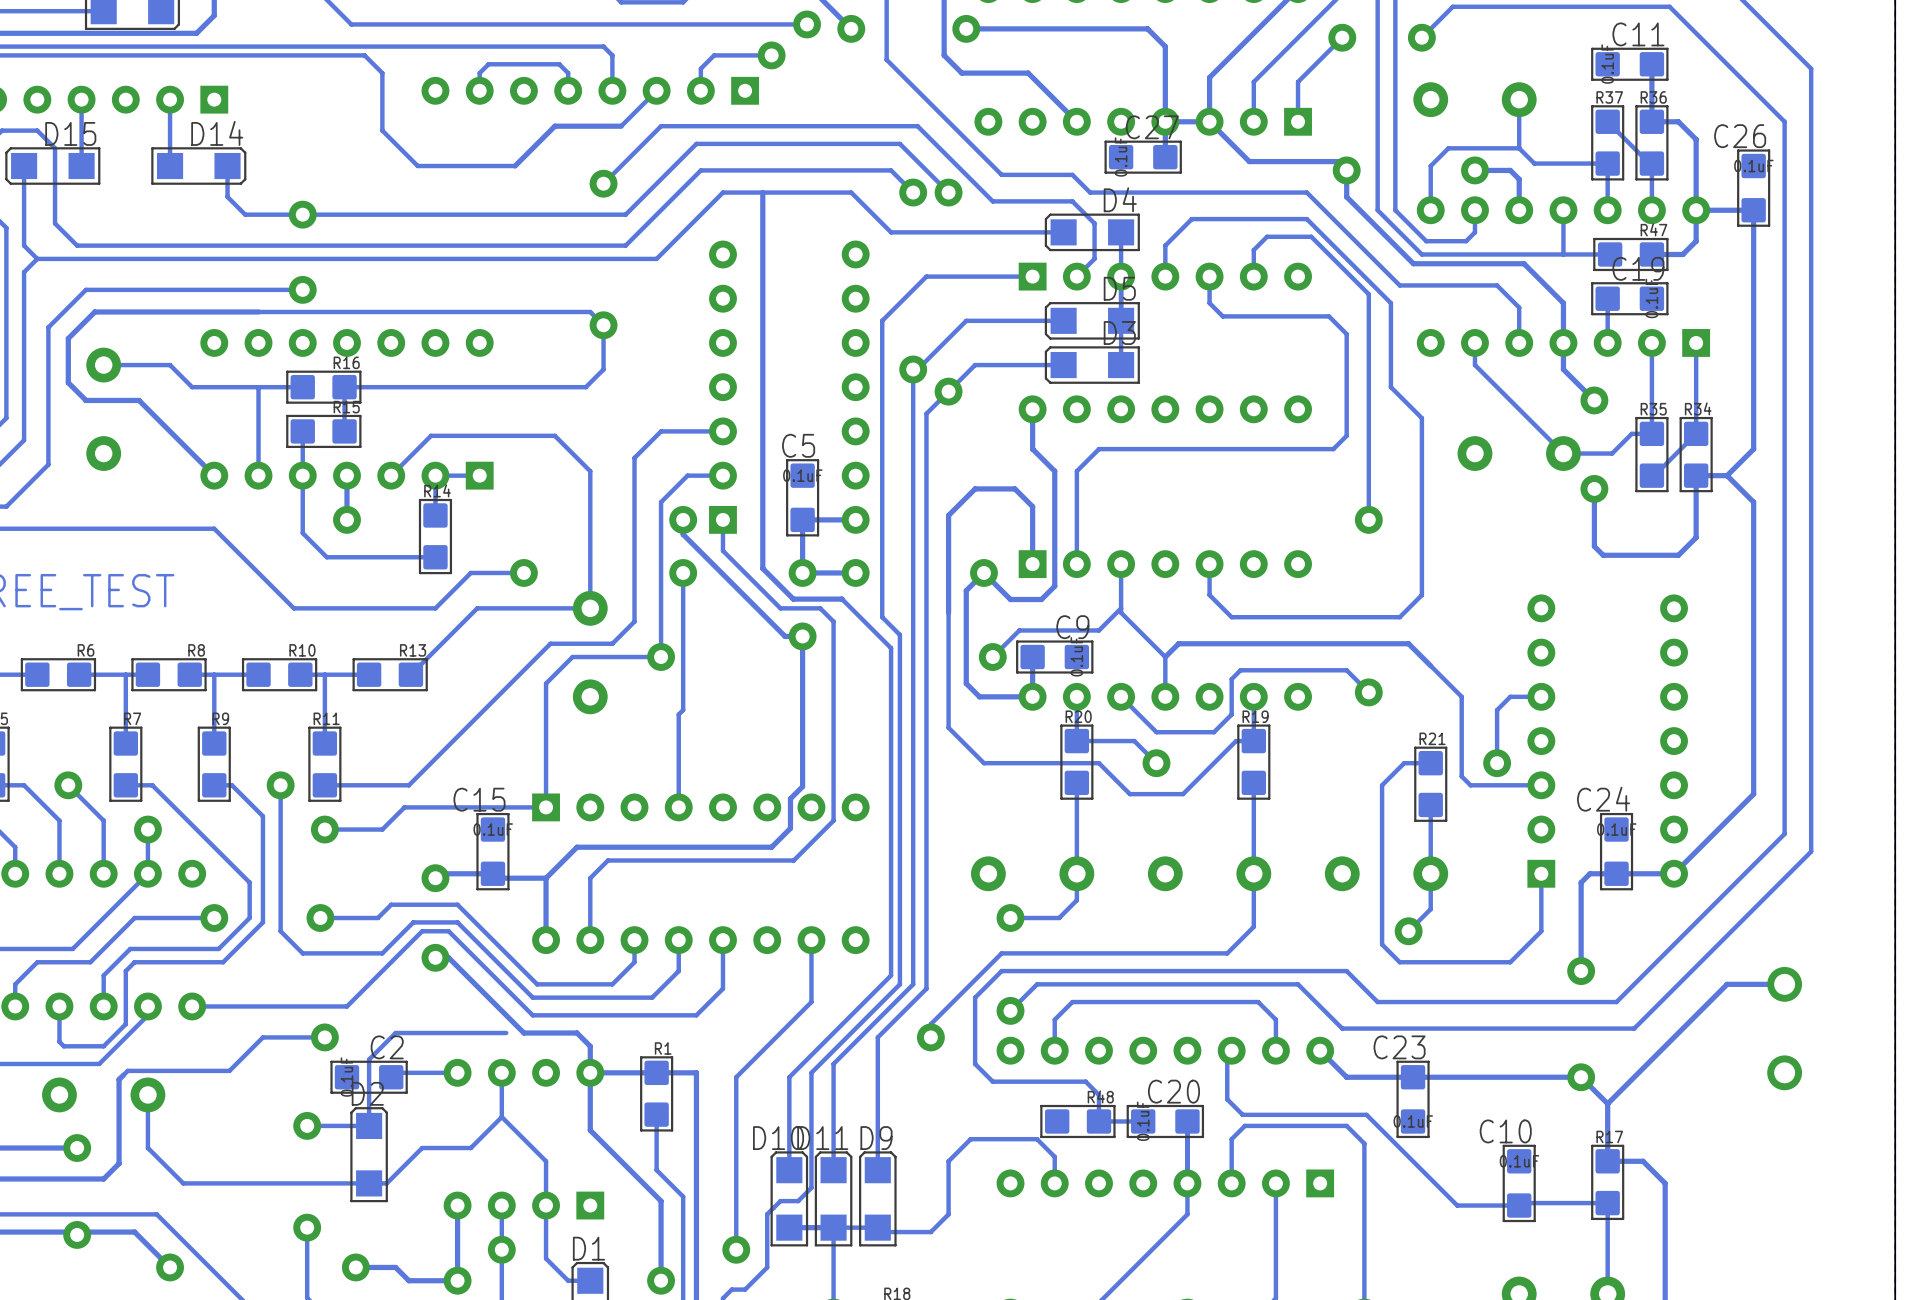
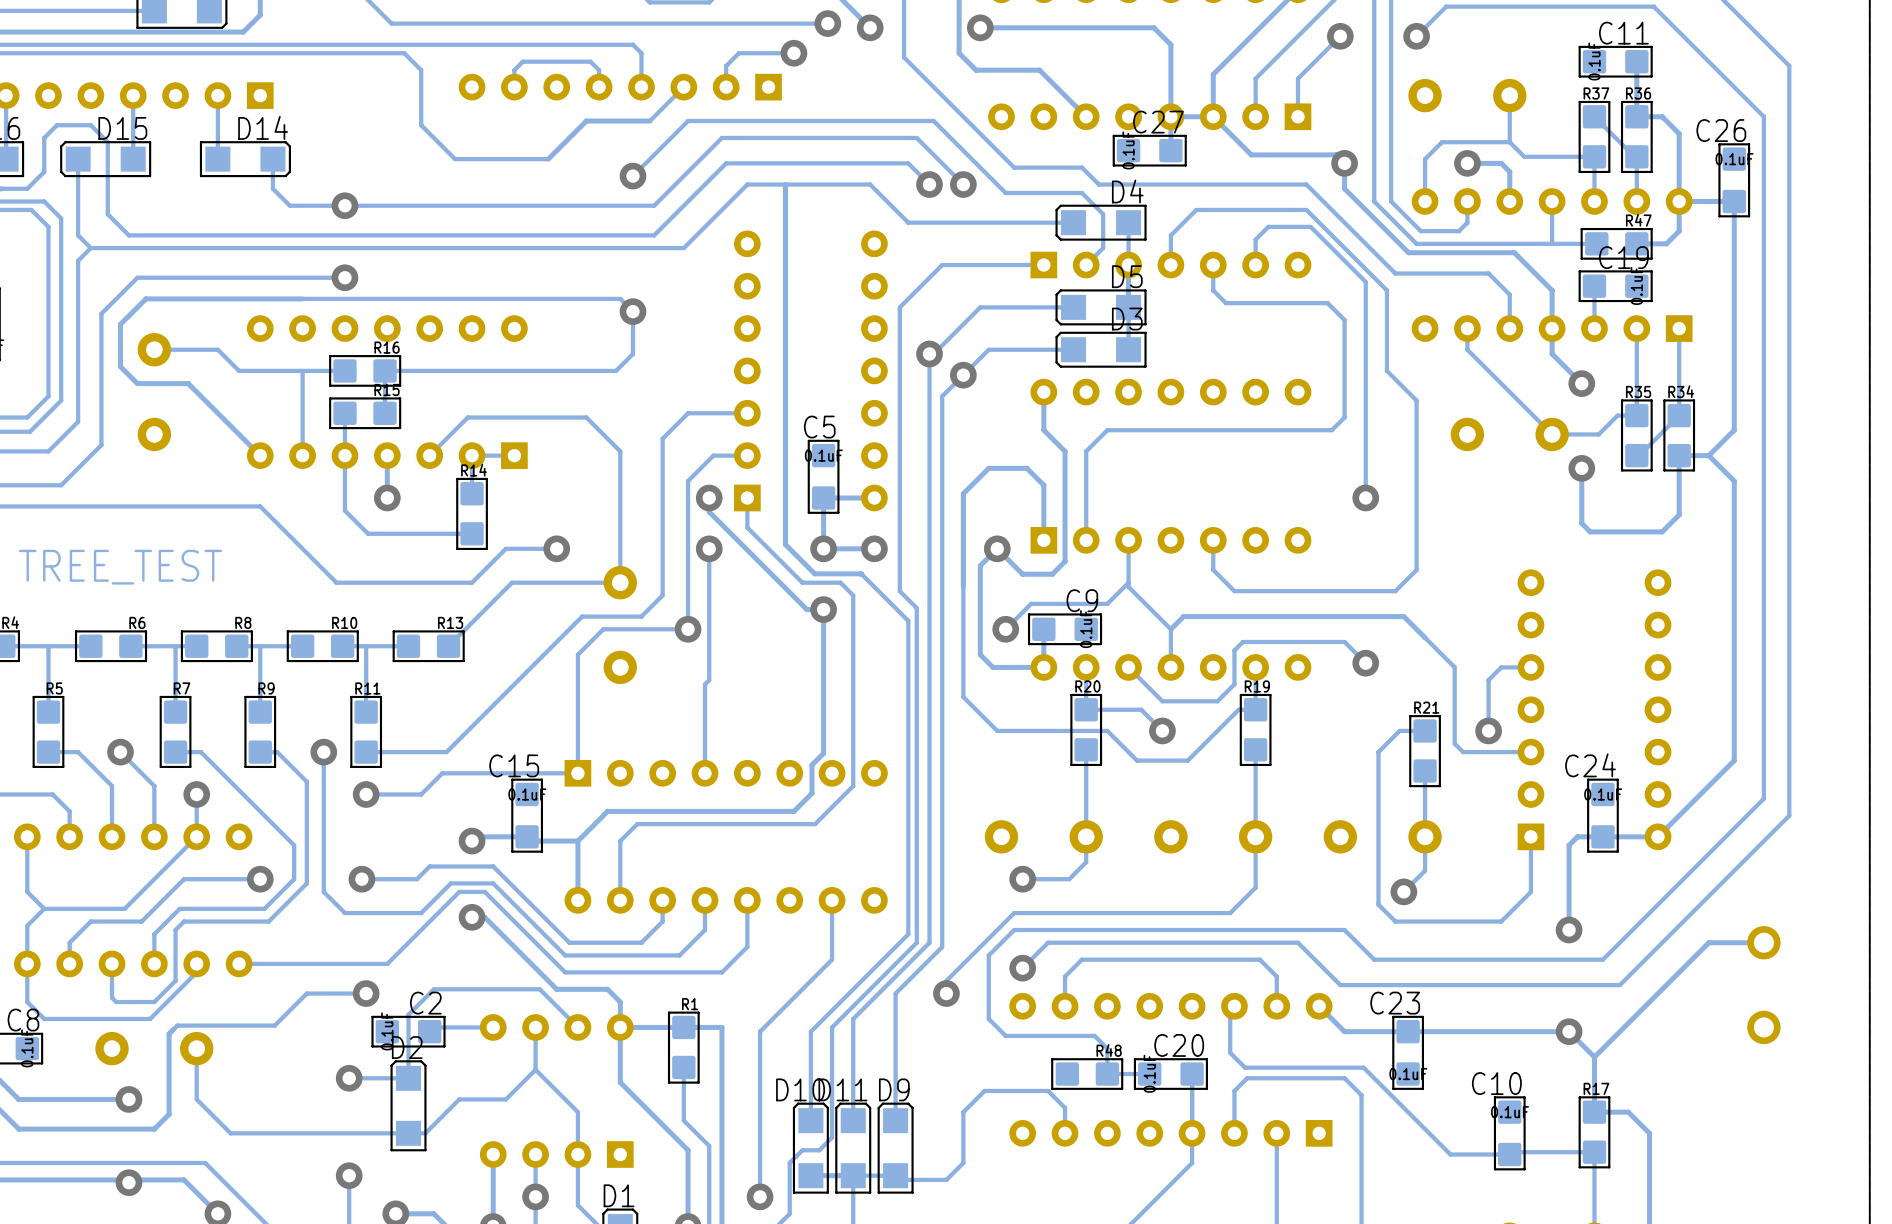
track: none -> (539, 989) (577, 1027)

